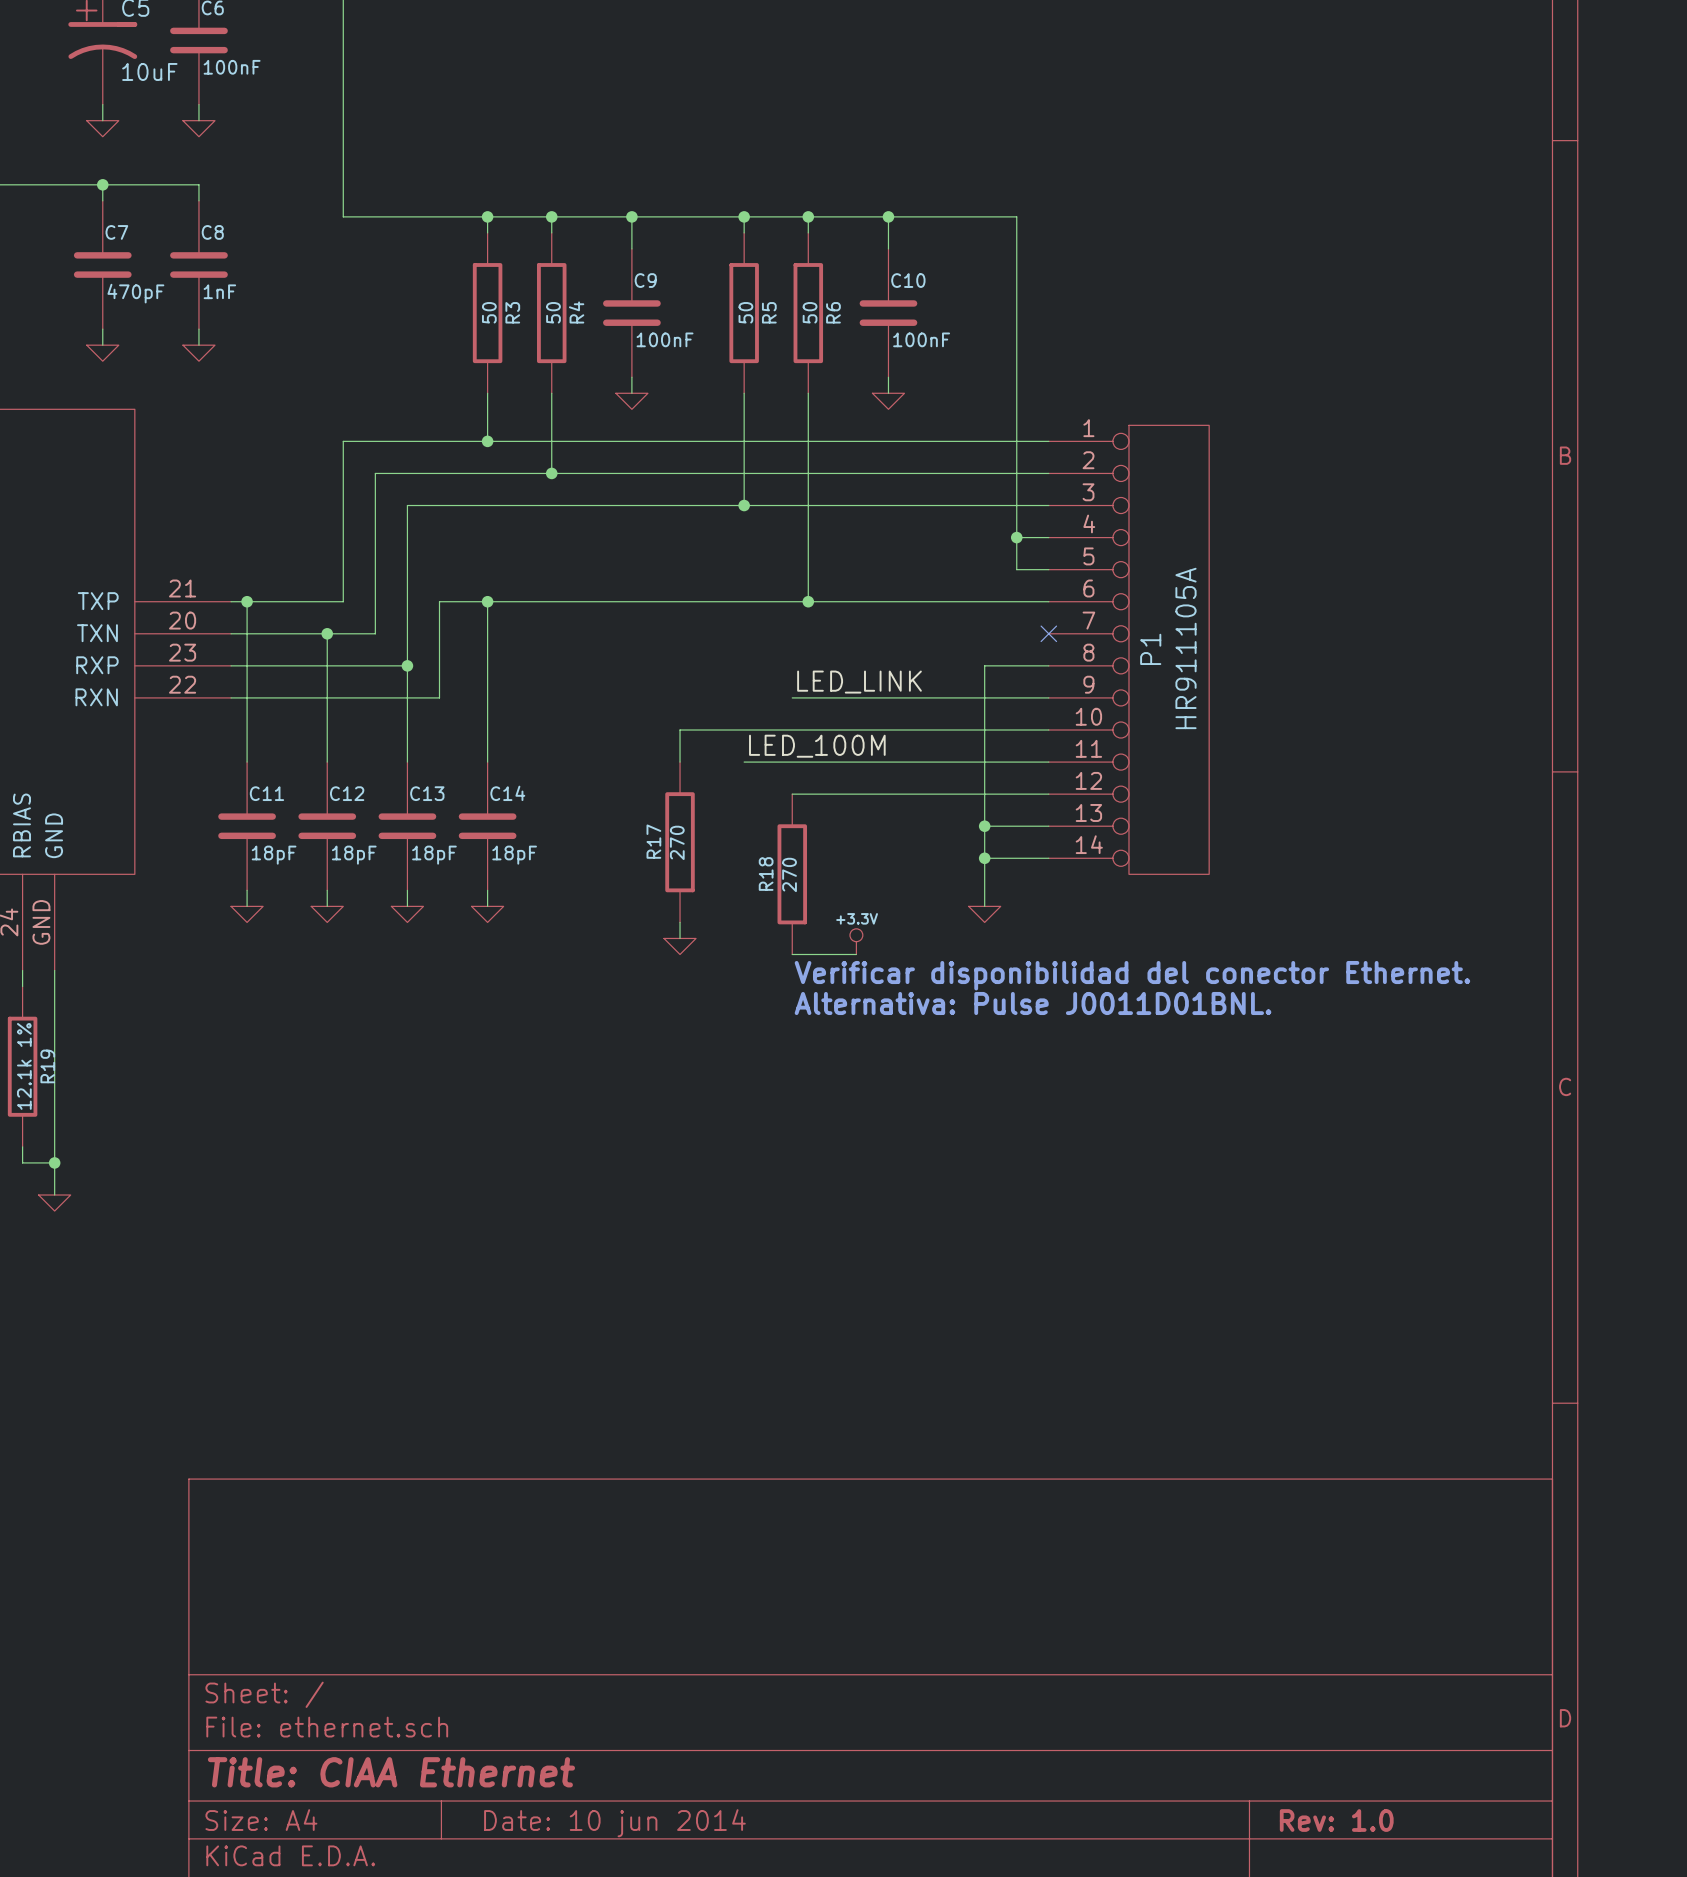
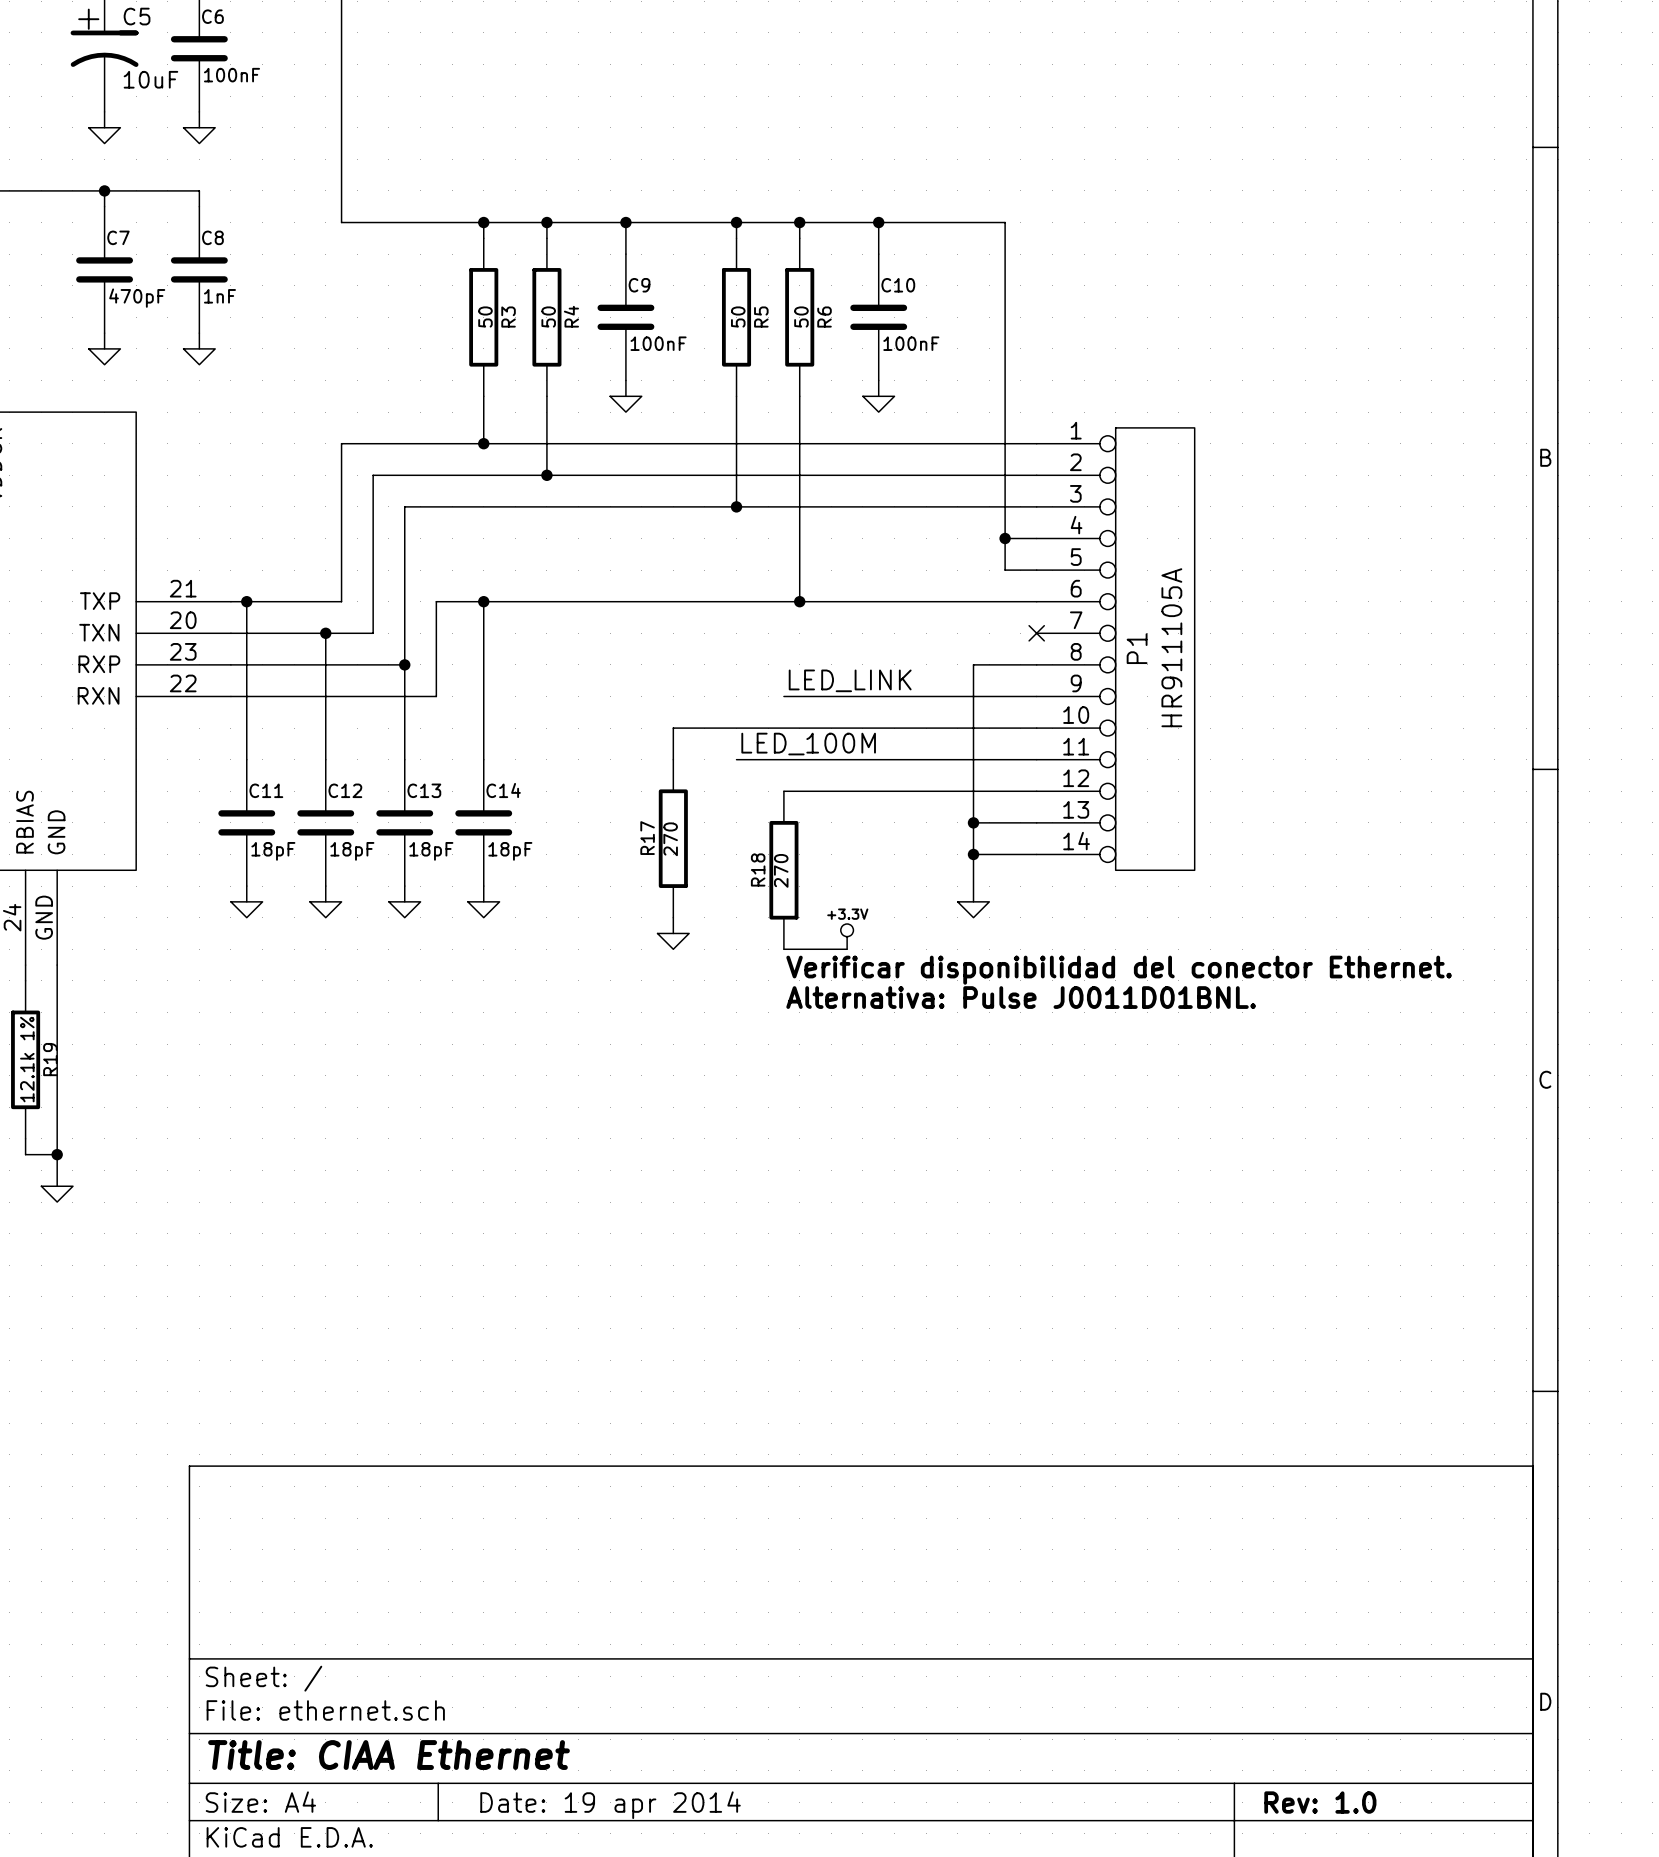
title block: Date: 10 jun 2014 (614, 1823) -> Date: 19 apr 2014 (610, 1805)

